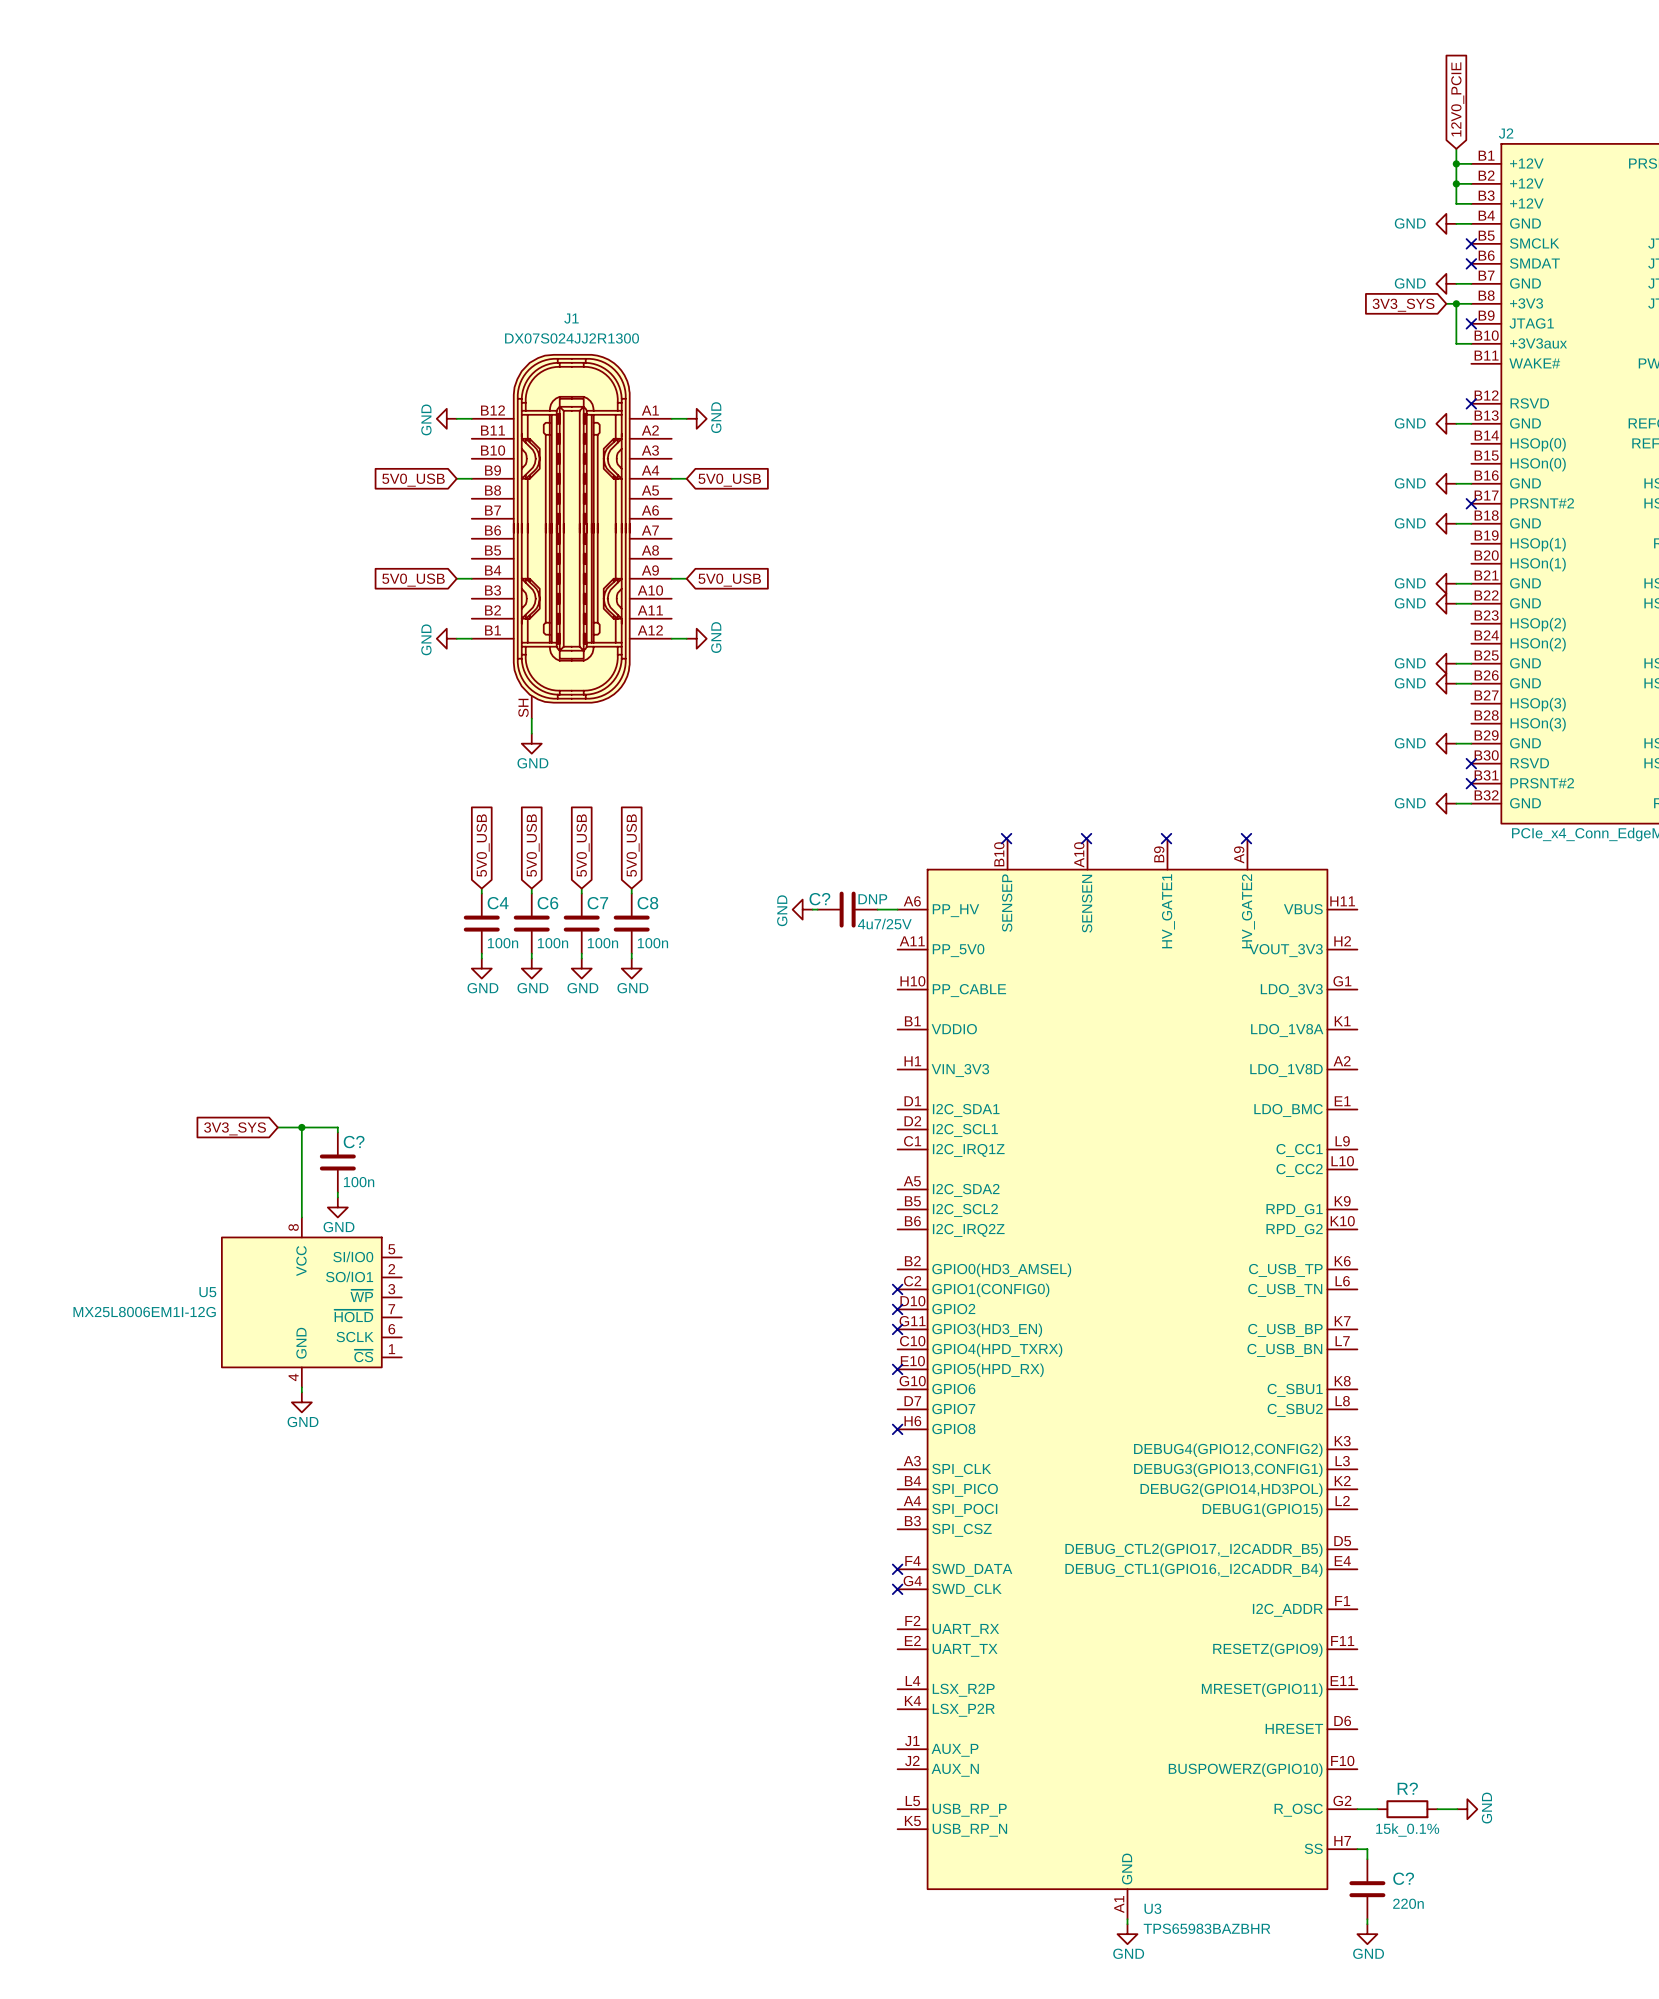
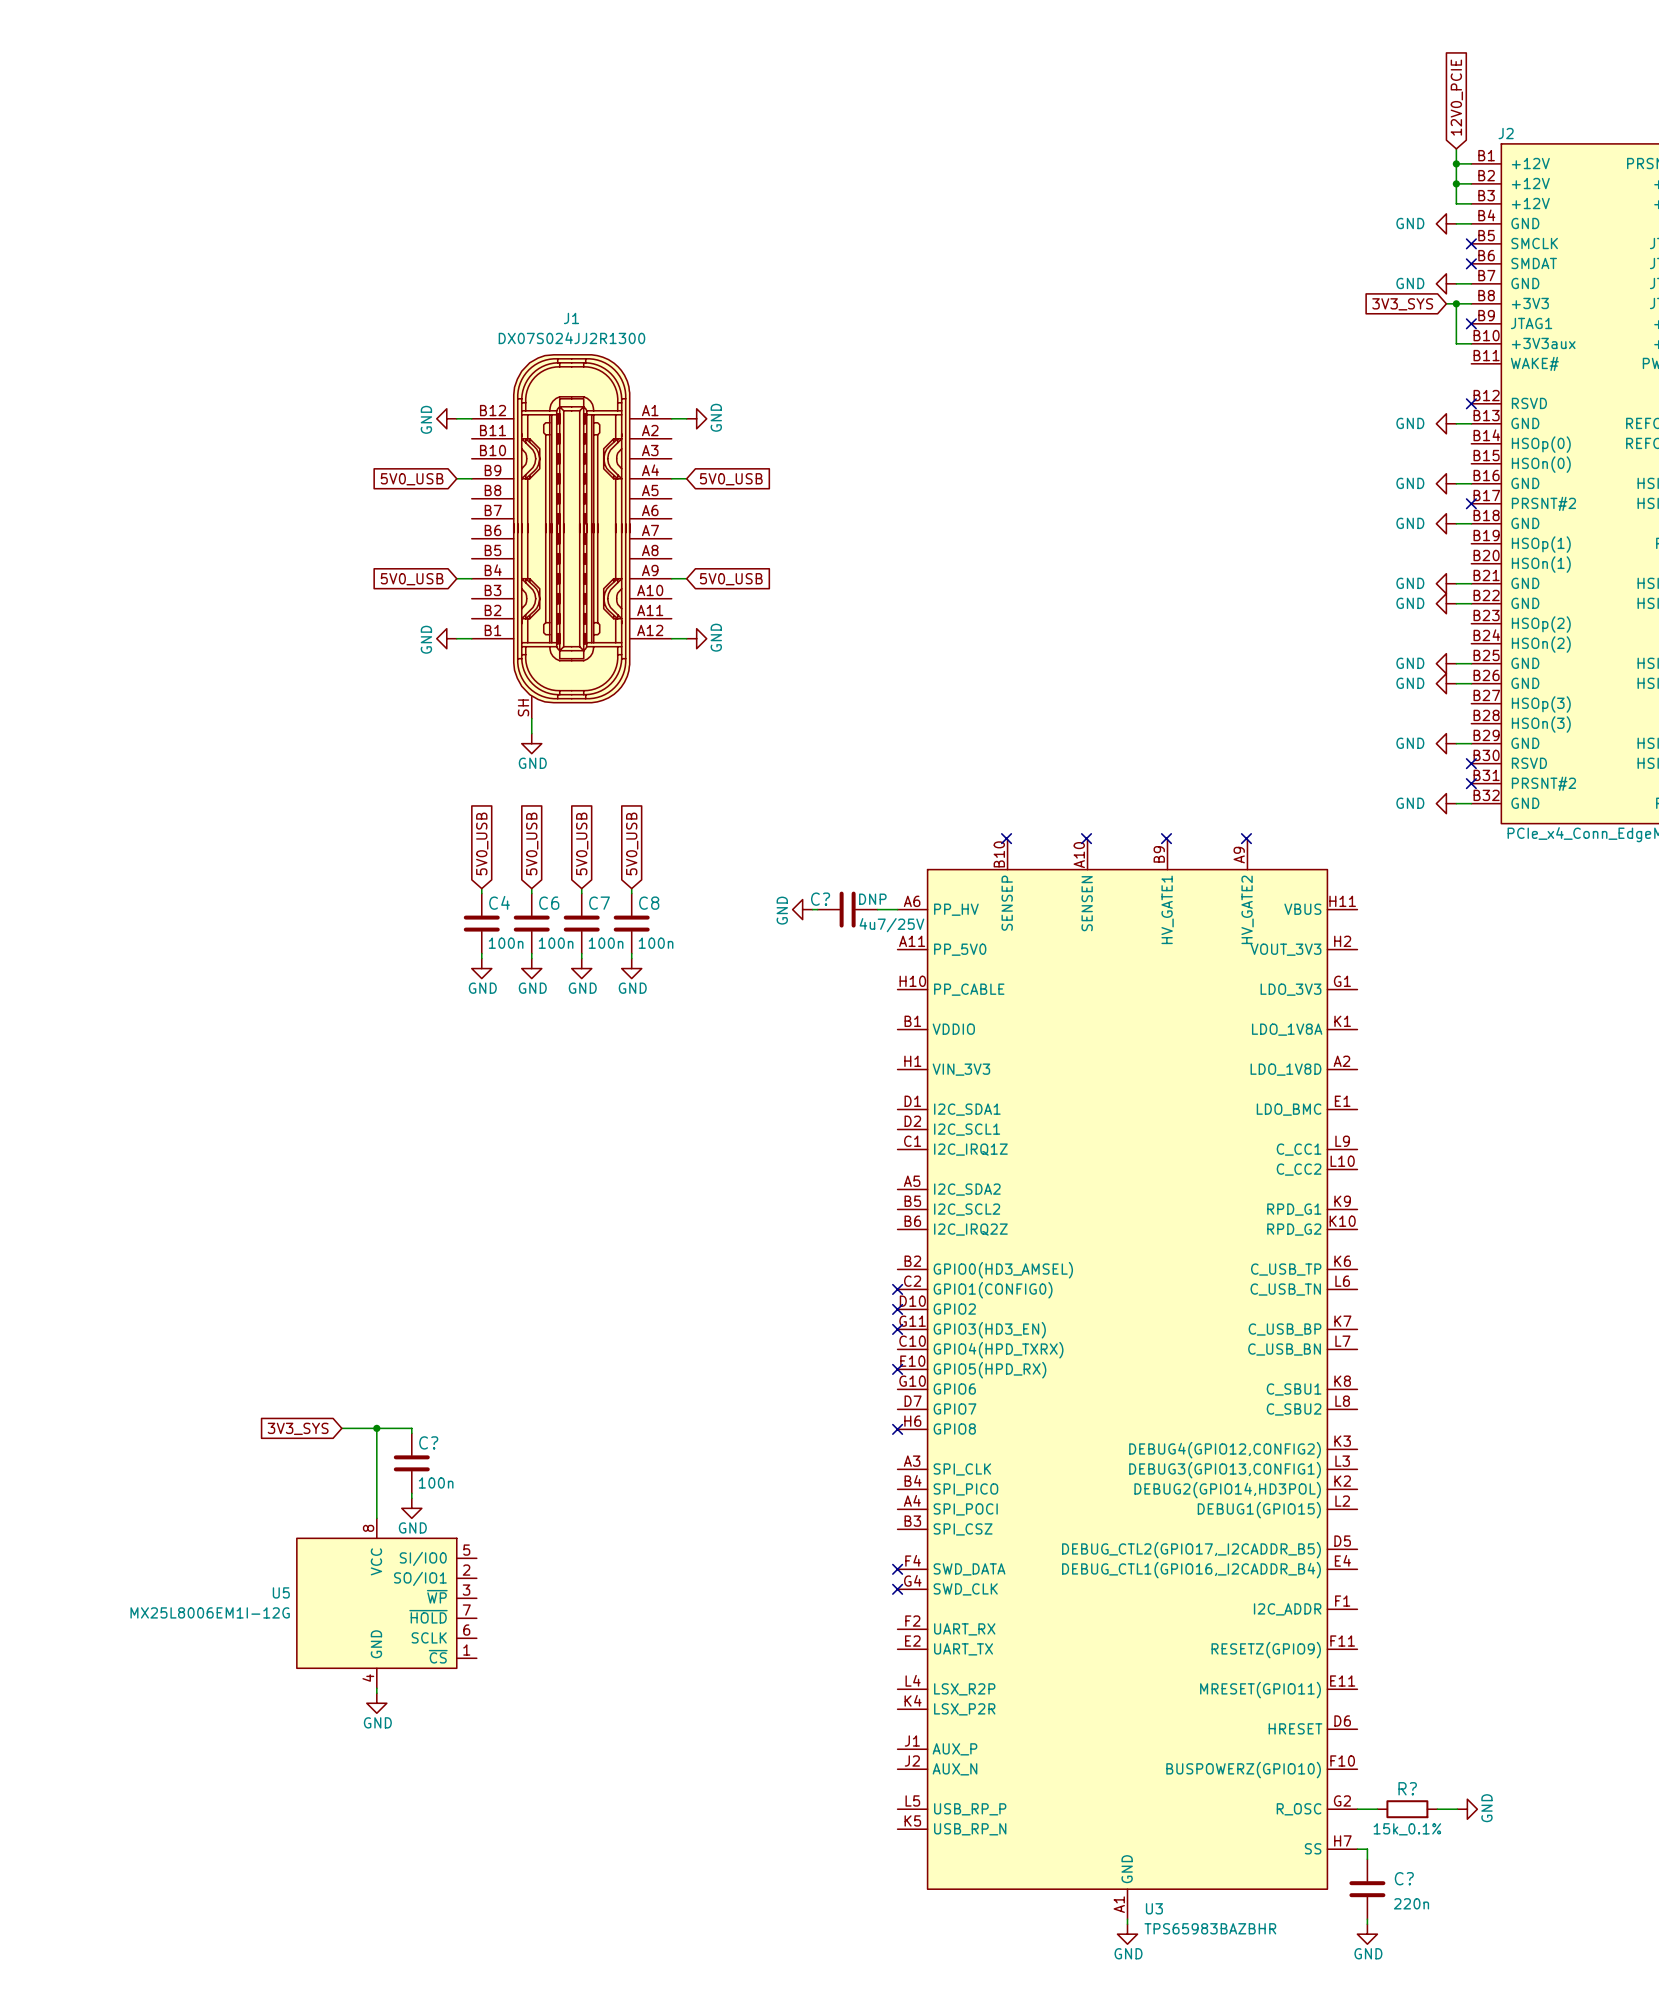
wire: (277, 1127) (337, 1127) (337, 1132) -> none
wire: (301, 1127) (301, 1217) -> none
junction: (301, 1127) -> none
global label: 3V3_SYS (235, 1128) -> none
C?: (337, 1162) -> none
wire: (337, 1192) (337, 1197) -> none
power symbol: GND (337, 1207) -> none
U5 position: (311, 1302) -> (386, 1603)
wire: (301, 1387) (301, 1392) -> (411, 1493) (411, 1498)
power symbol position: GND (301, 1402) -> GND (411, 1508)
wire: none -> (341, 1428) (411, 1428) (411, 1433)
wire: none -> (376, 1428) (376, 1518)
junction: none -> (376, 1428)
global label: none -> 3V3_SYS (298, 1428)
C?: none -> (411, 1463)
wire: none -> (376, 1688) (376, 1693)
power symbol: none -> GND (376, 1703)

